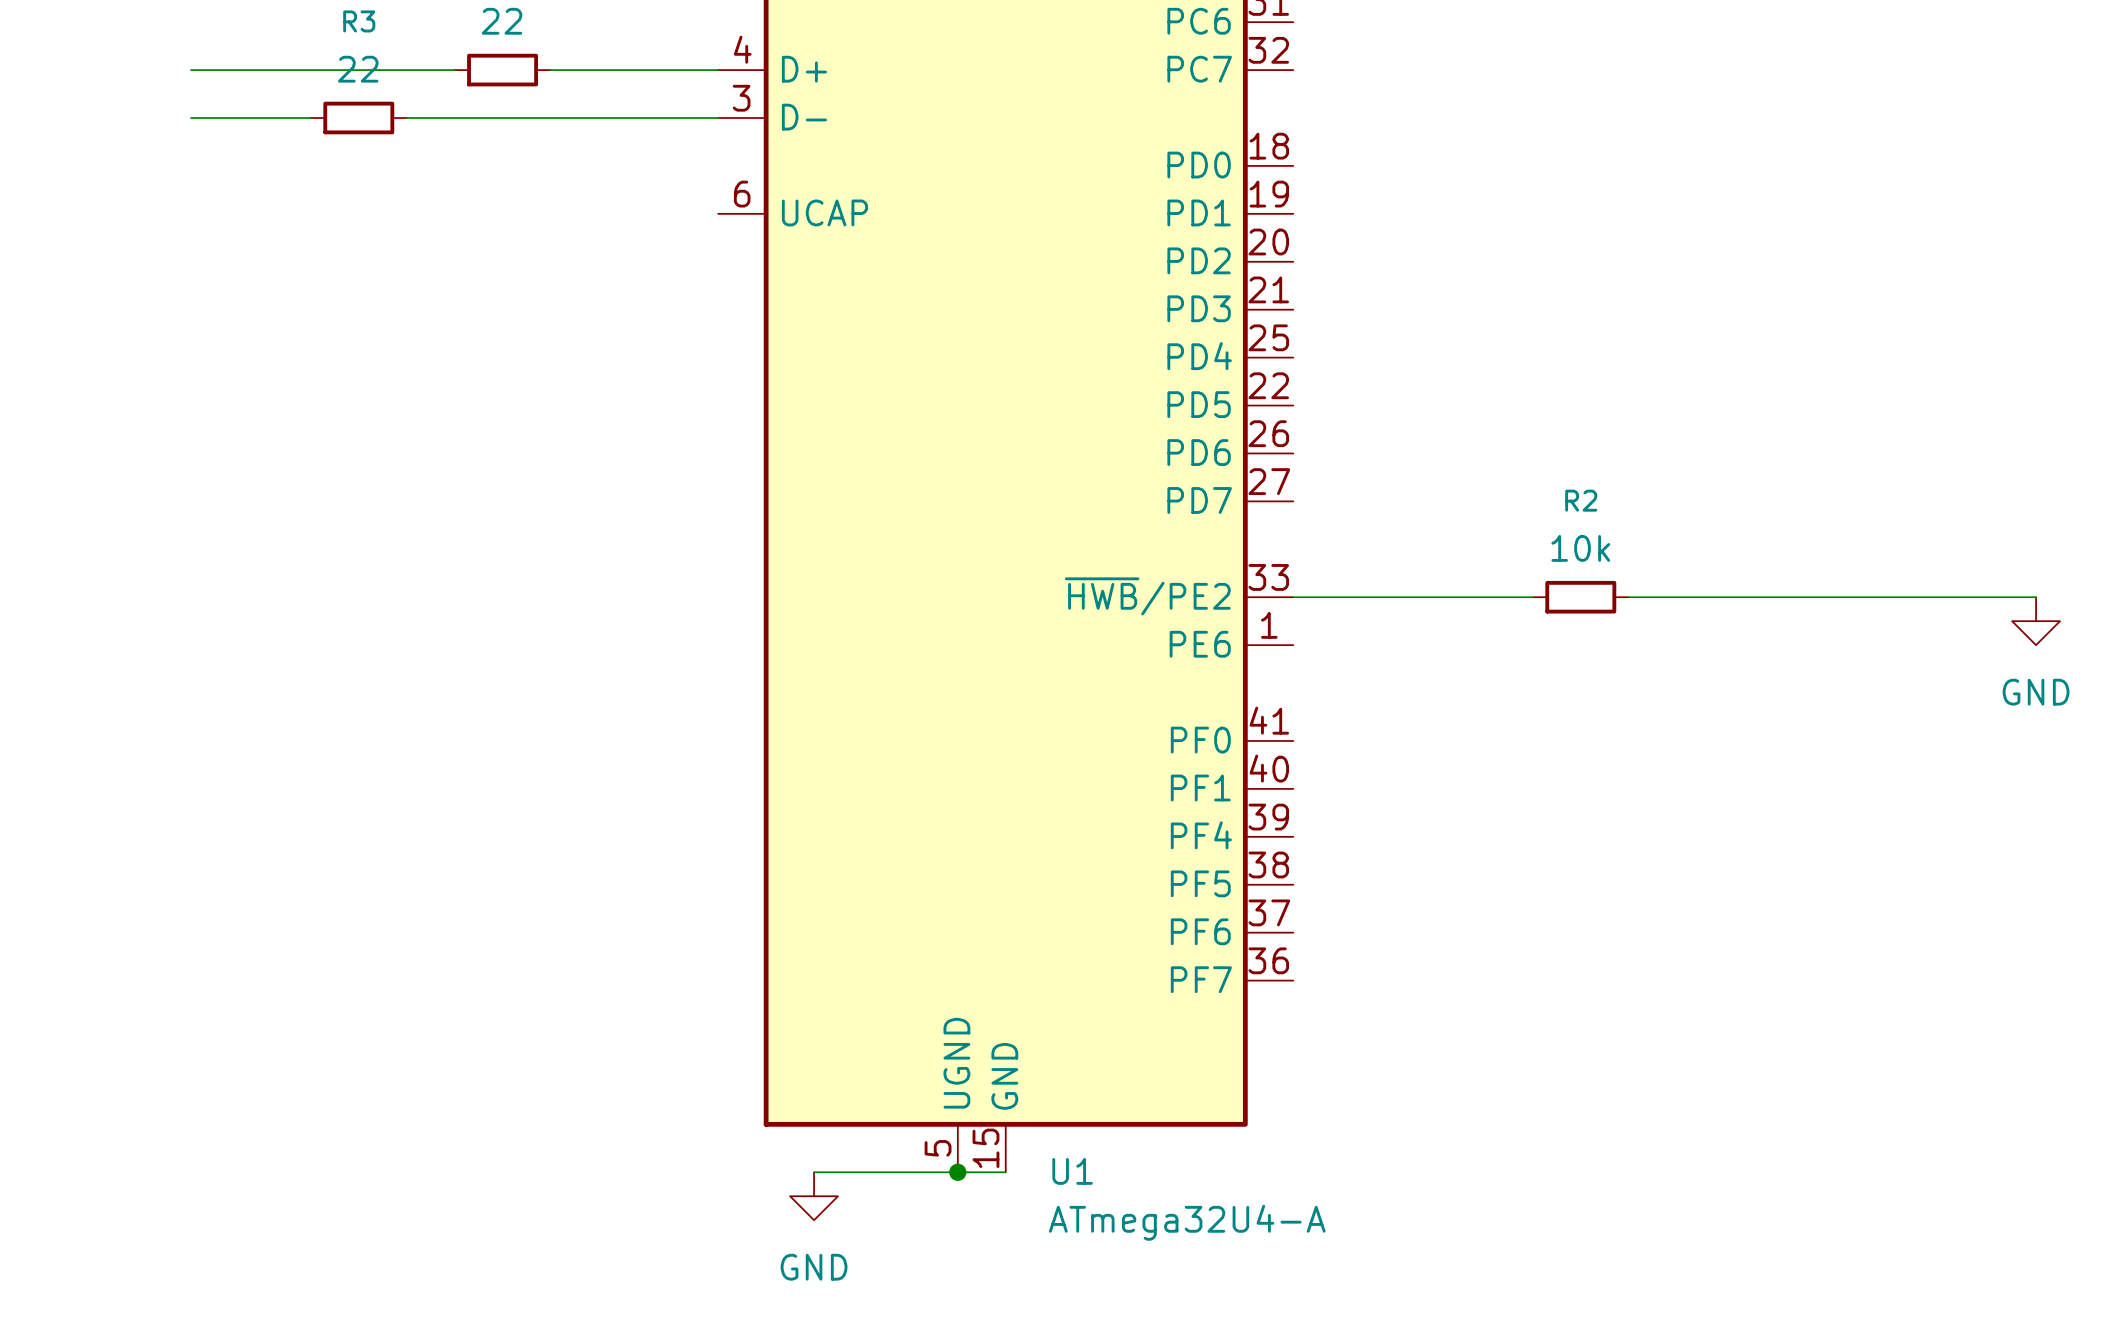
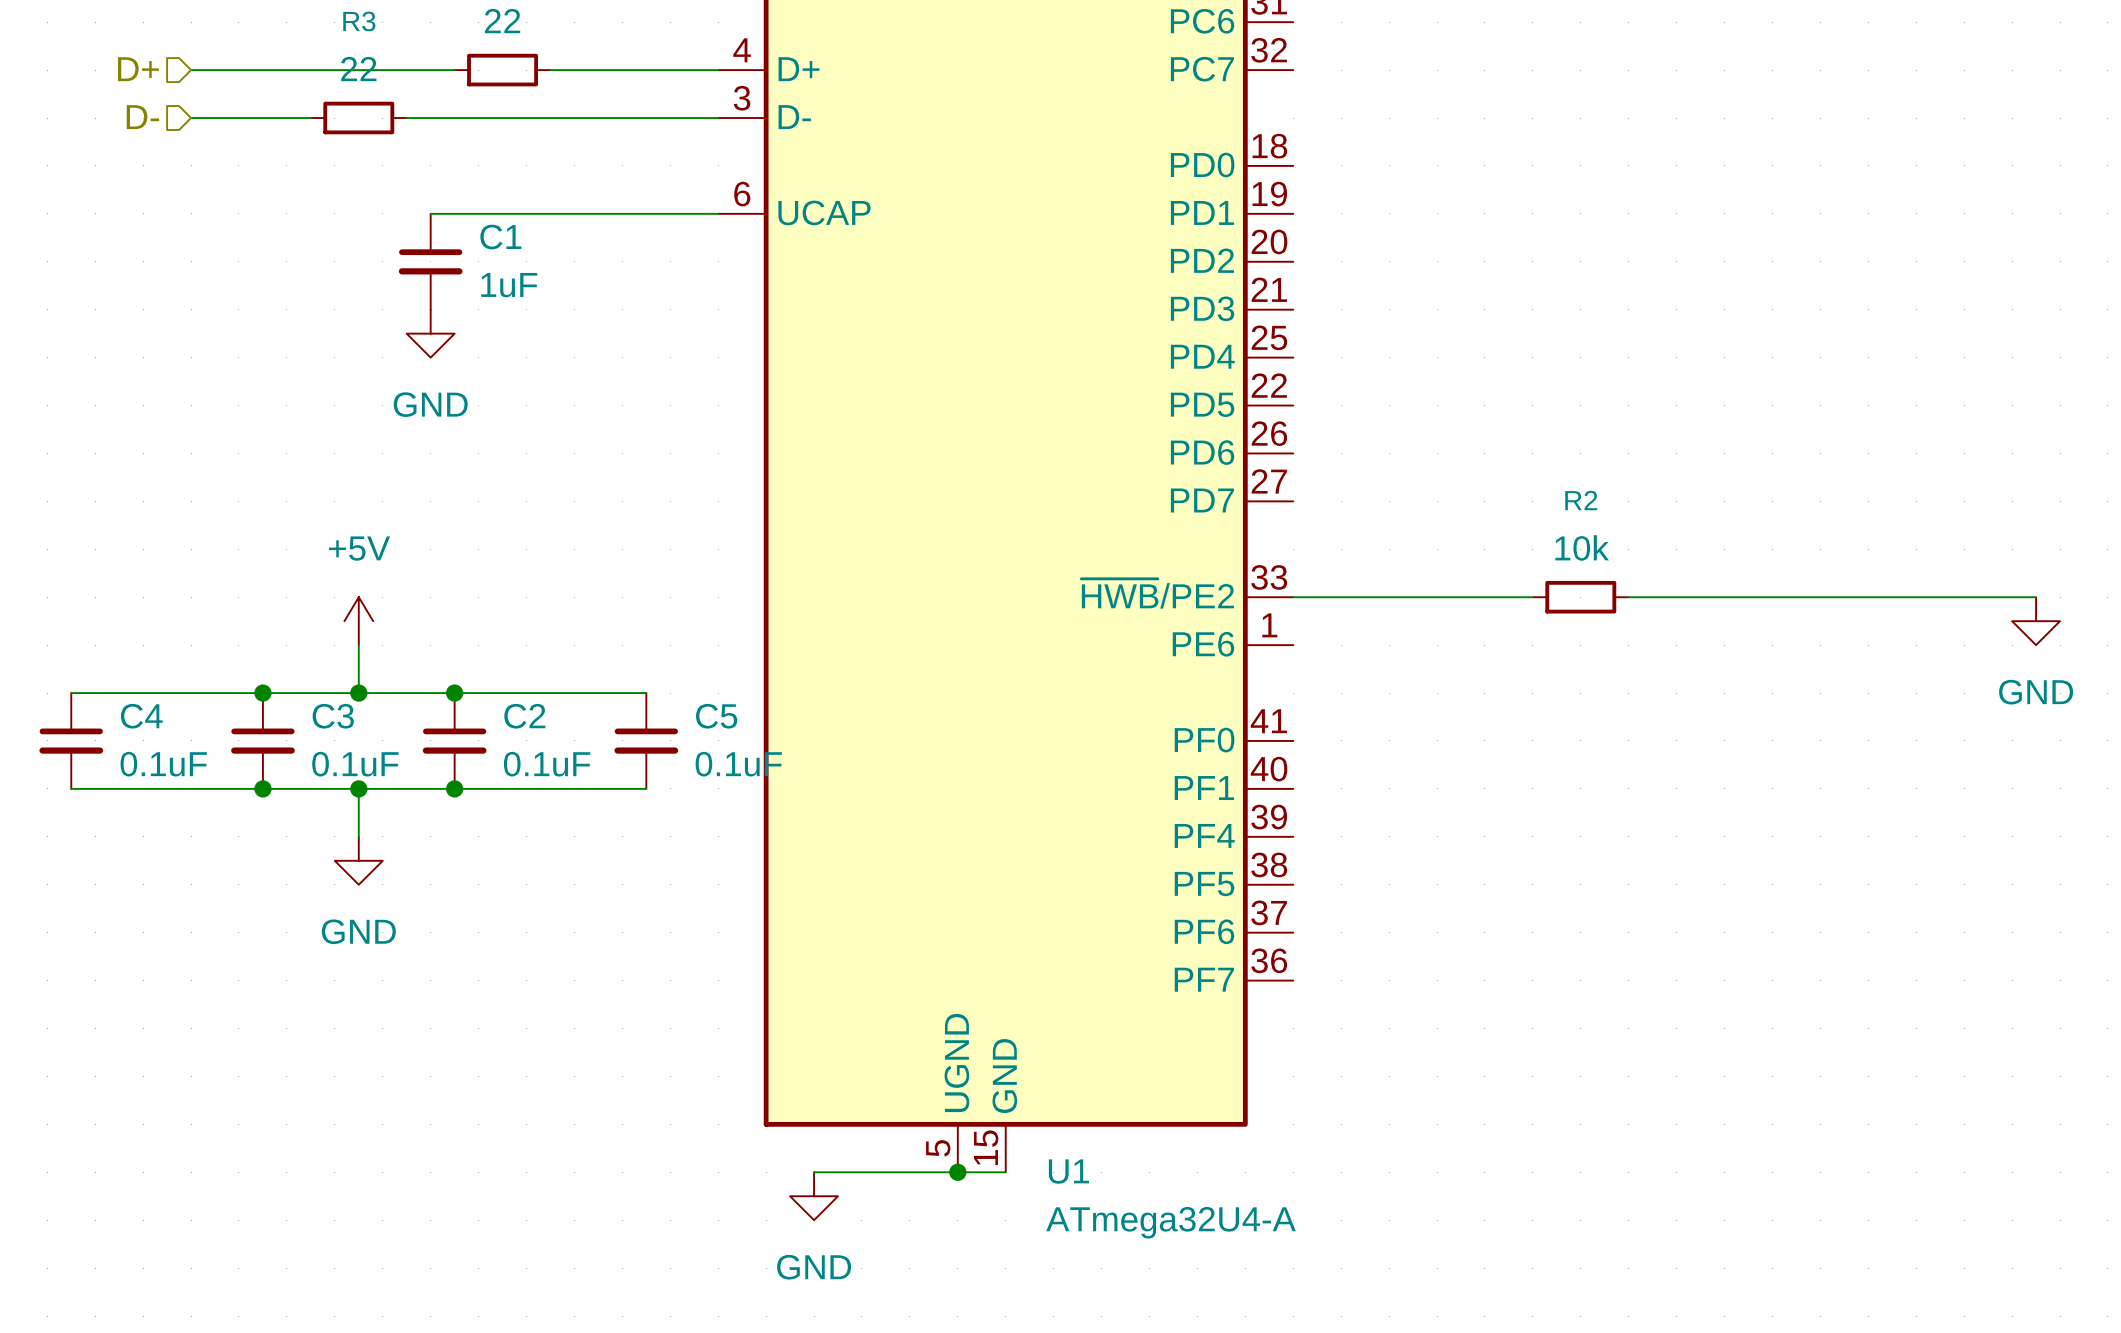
hierarchical label: none -> D+ (138, 69)
hierarchical label: none -> D- (142, 117)
wire: none -> (430, 213) (718, 213)
C1: none -> 1uF (430, 261)
power symbol: none -> GND (430, 333)
power symbol: none -> +5V (358, 621)
wire: none -> (358, 645) (358, 693)
wire: none -> (71, 693) (646, 693)
junction: none -> (262, 693)
junction: none -> (358, 693)
junction: none -> (454, 693)
C4: none -> 0.1uF (71, 740)
C3: none -> 0.1uF (262, 740)
C2: none -> 0.1uF (454, 740)
C5: none -> 0.1uF (646, 740)
wire: none -> (71, 788) (646, 788)
junction: none -> (262, 788)
wire: none -> (358, 788) (358, 836)
junction: none -> (358, 788)
junction: none -> (454, 788)
power symbol: none -> GND (358, 860)

